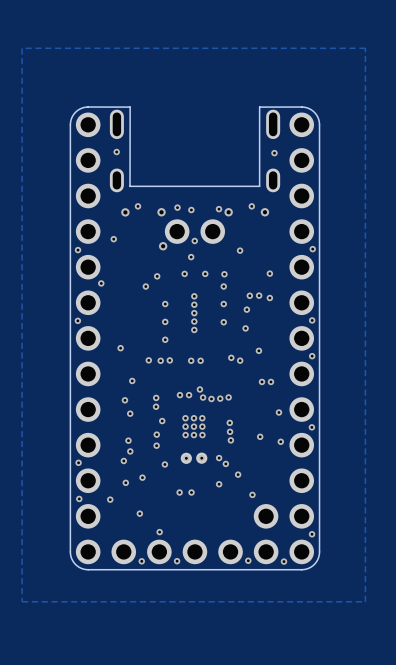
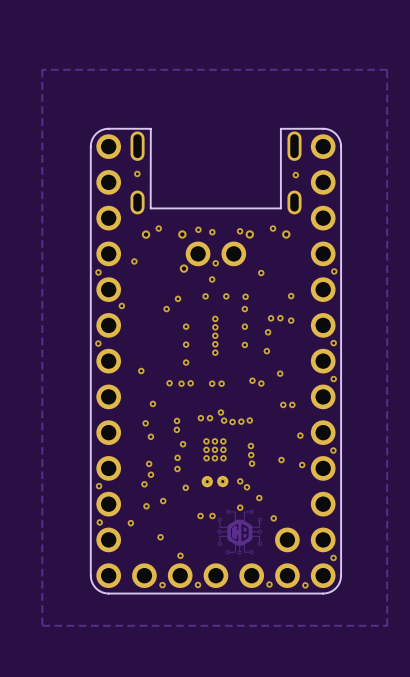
drawing: none -> [217, 509, 263, 555]

